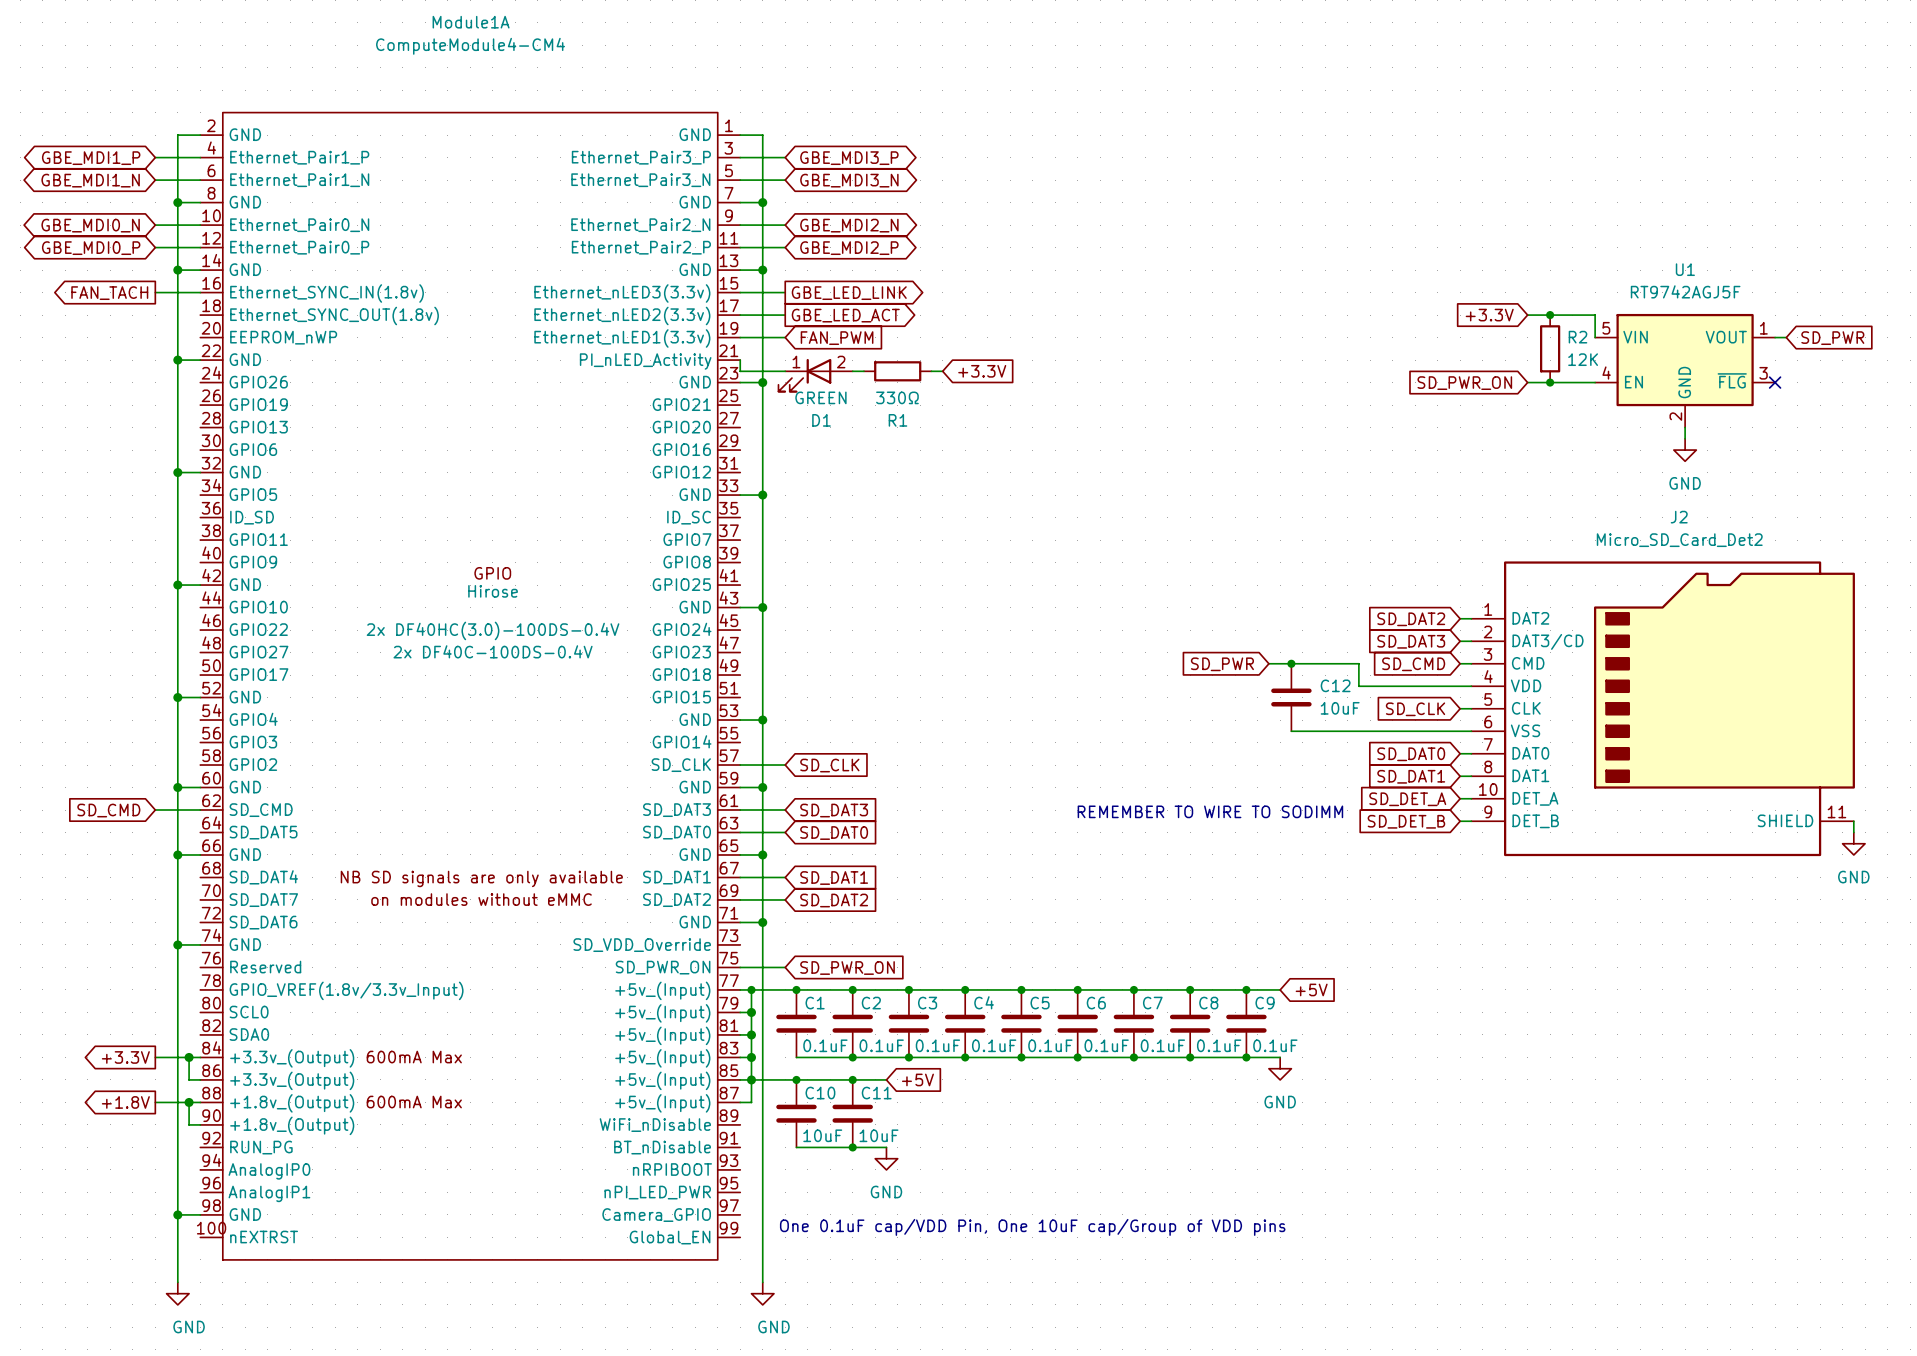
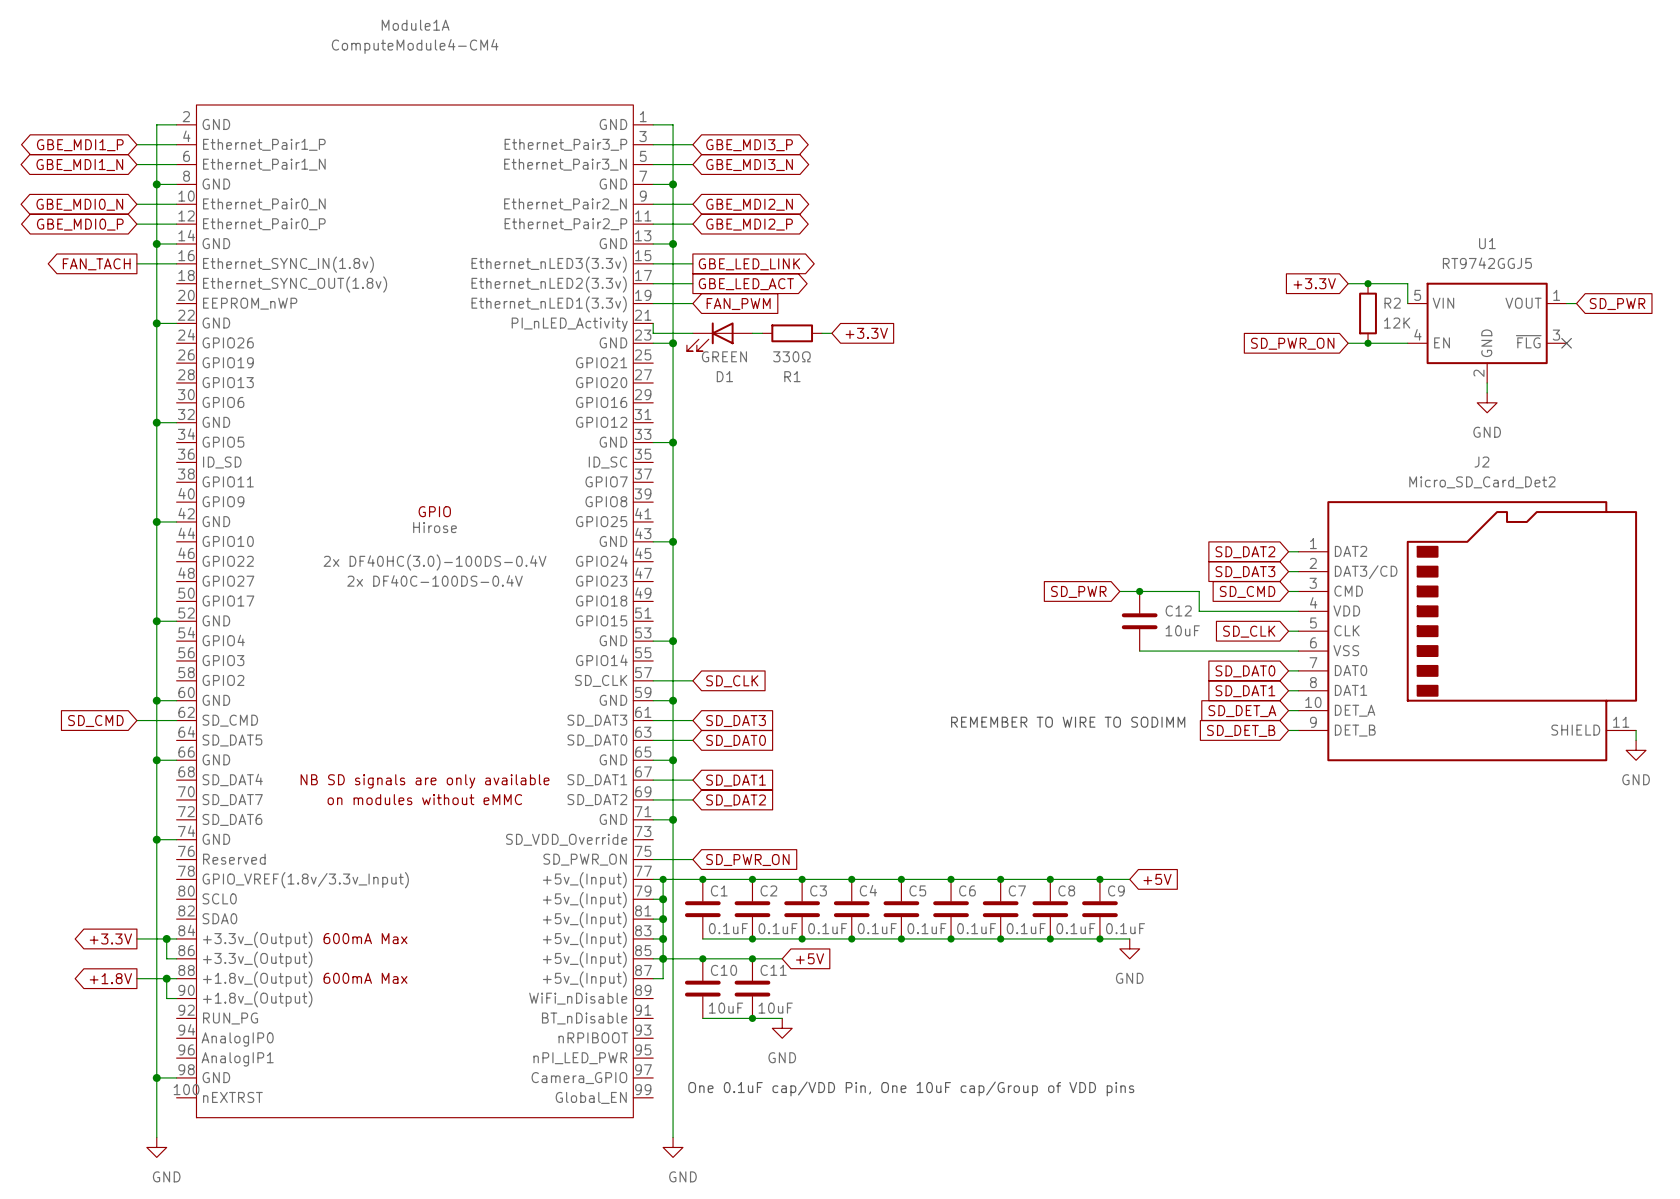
U1 value: RT9742AGJ5F (1685, 291) -> RT9742GGJ5 (1487, 263)
D1 pin number: 1 (796, 362) -> none
D1 pin number: 2 (841, 362) -> none

